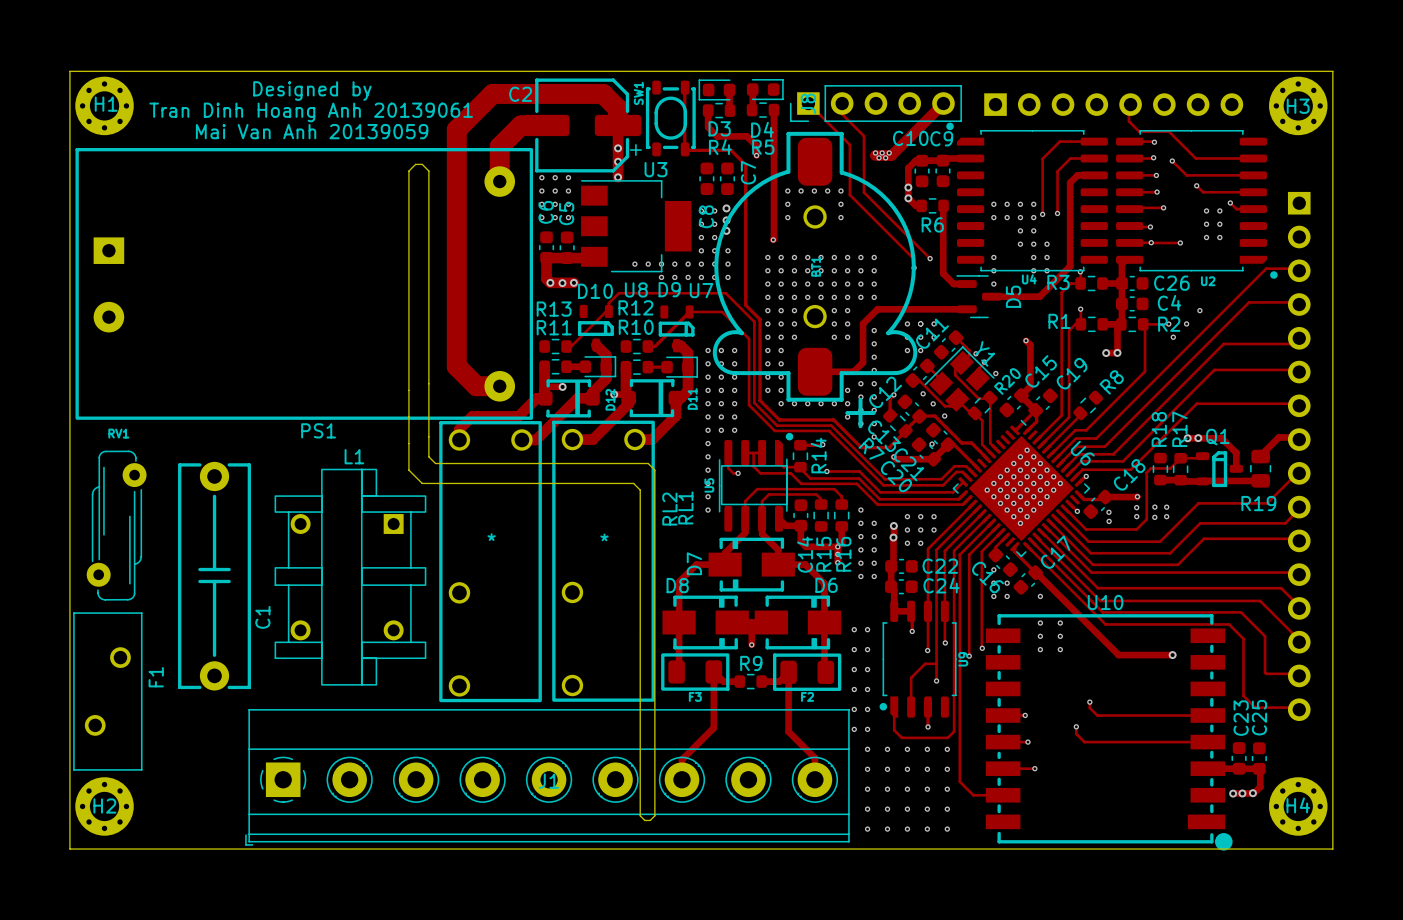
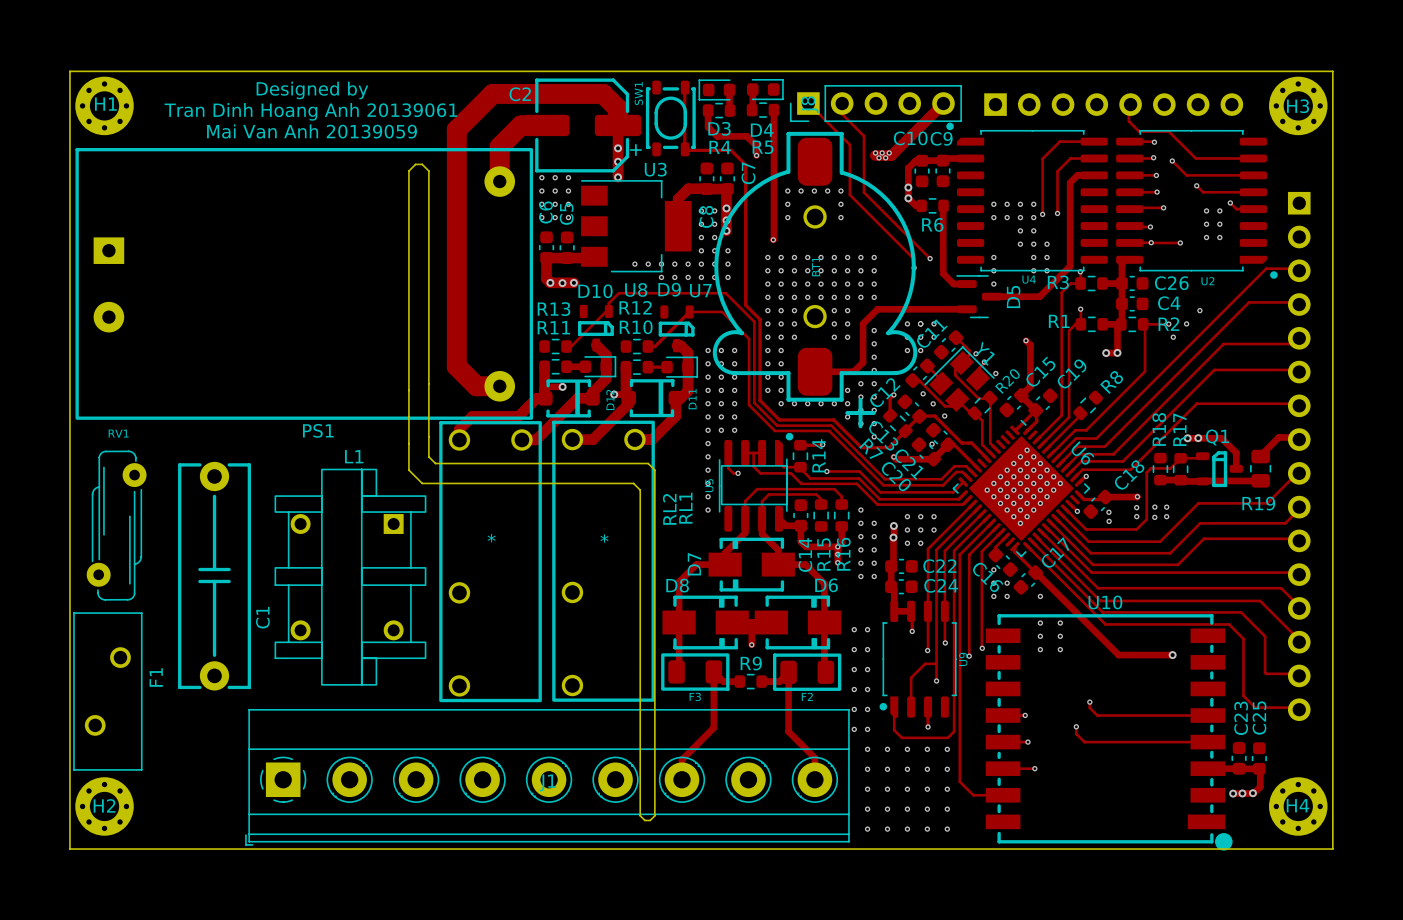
track: none -> (678, 226) (678, 198) (688, 188) (727, 189) (726, 230)

